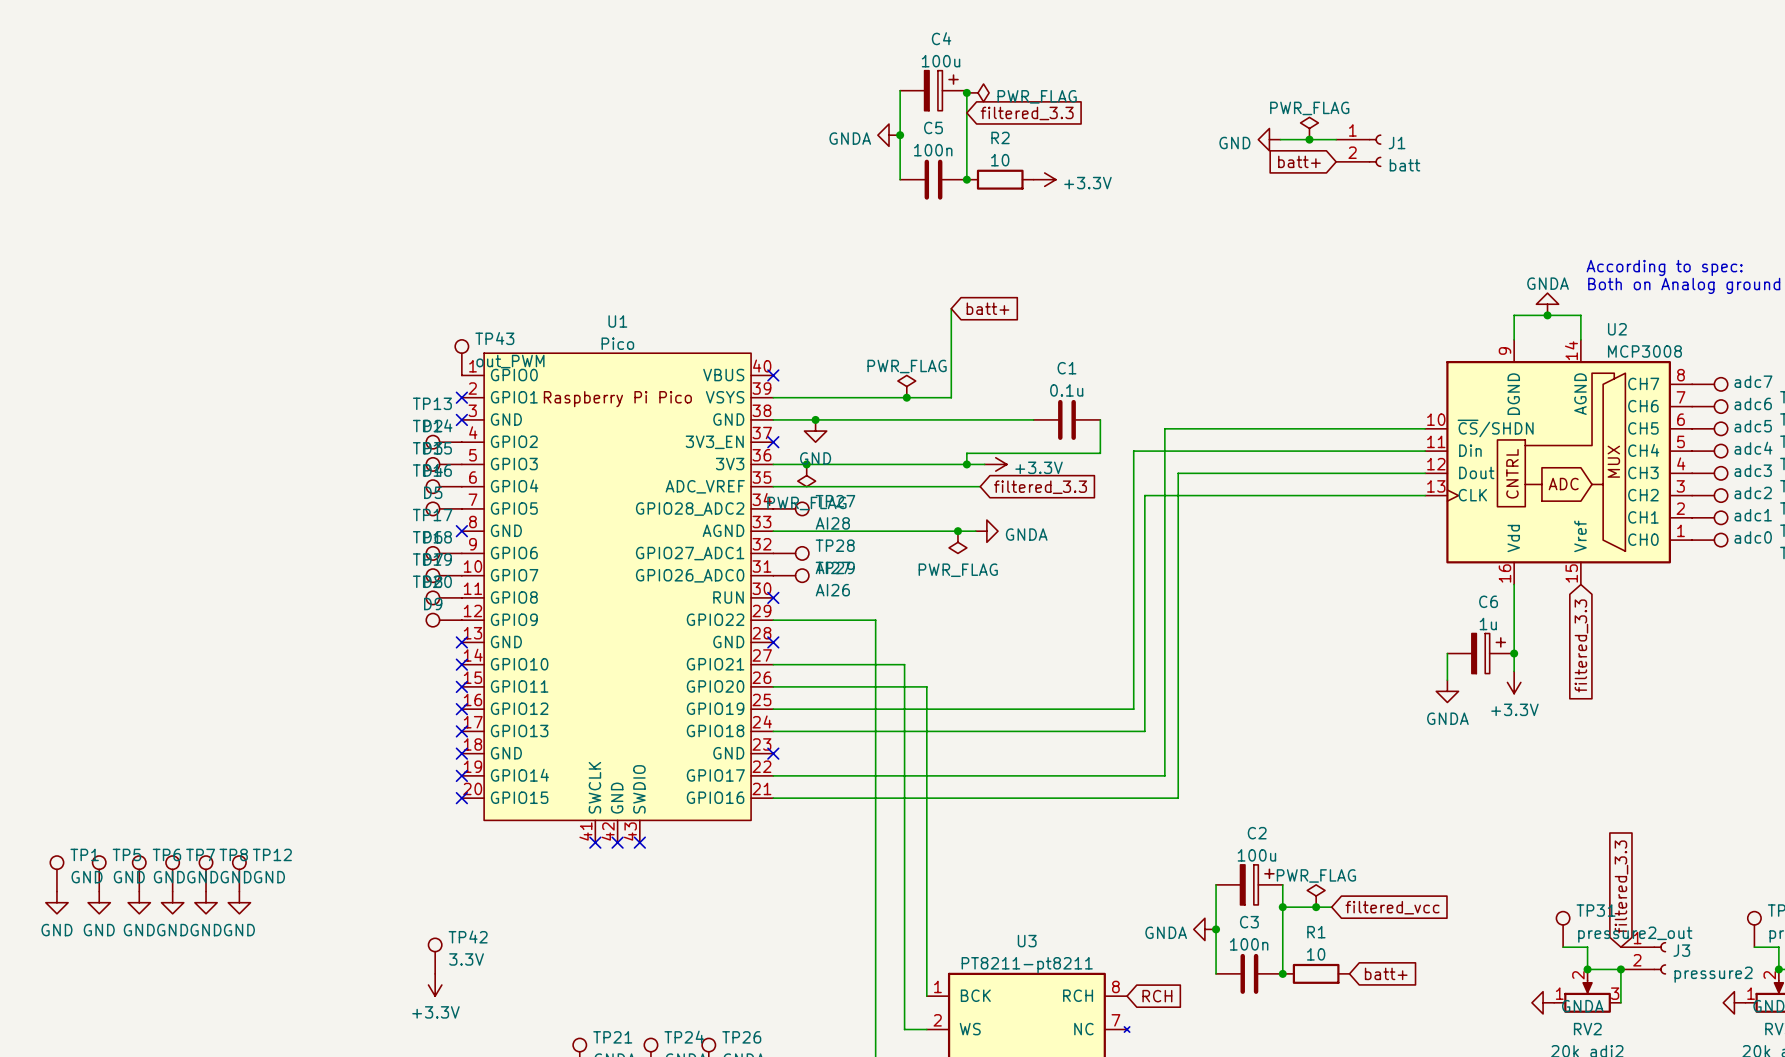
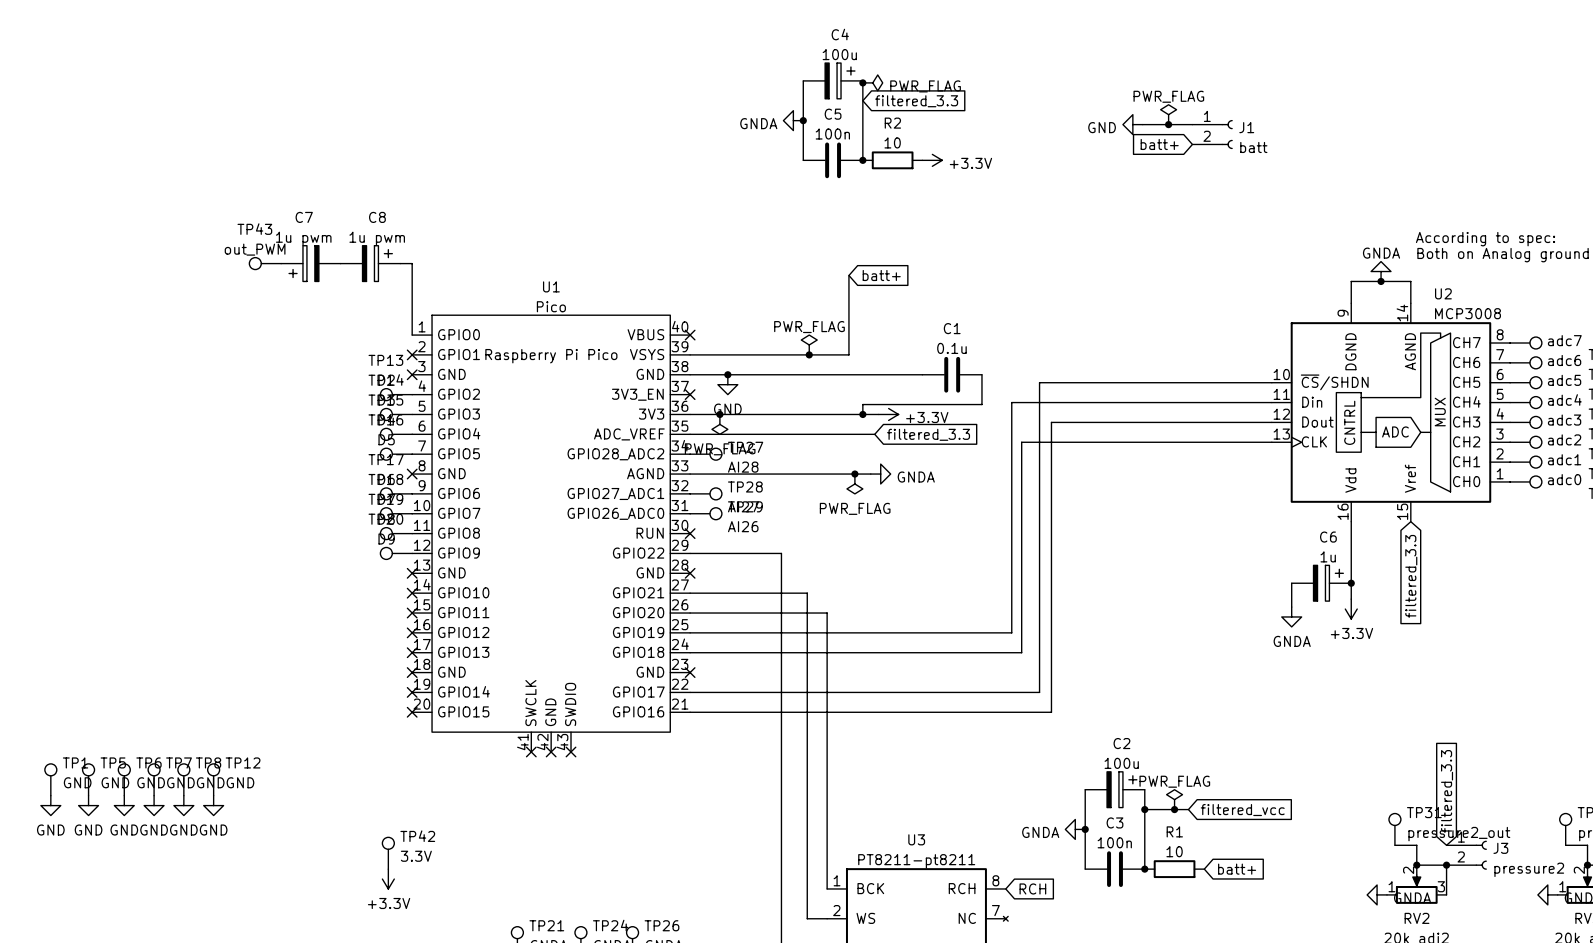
C7: none -> 1u pwm (310, 263)
C8: none -> 1u pwm (370, 263)
wire: none -> (400, 263) (412, 263) (412, 335)
TP43 rotation: 0° (461, 346) -> 90° counterclockwise (255, 263)
TP43 position: (461, 357) -> (265, 263)
TP43 value position: out_PWM (510, 361) -> out_PWM (255, 249)

